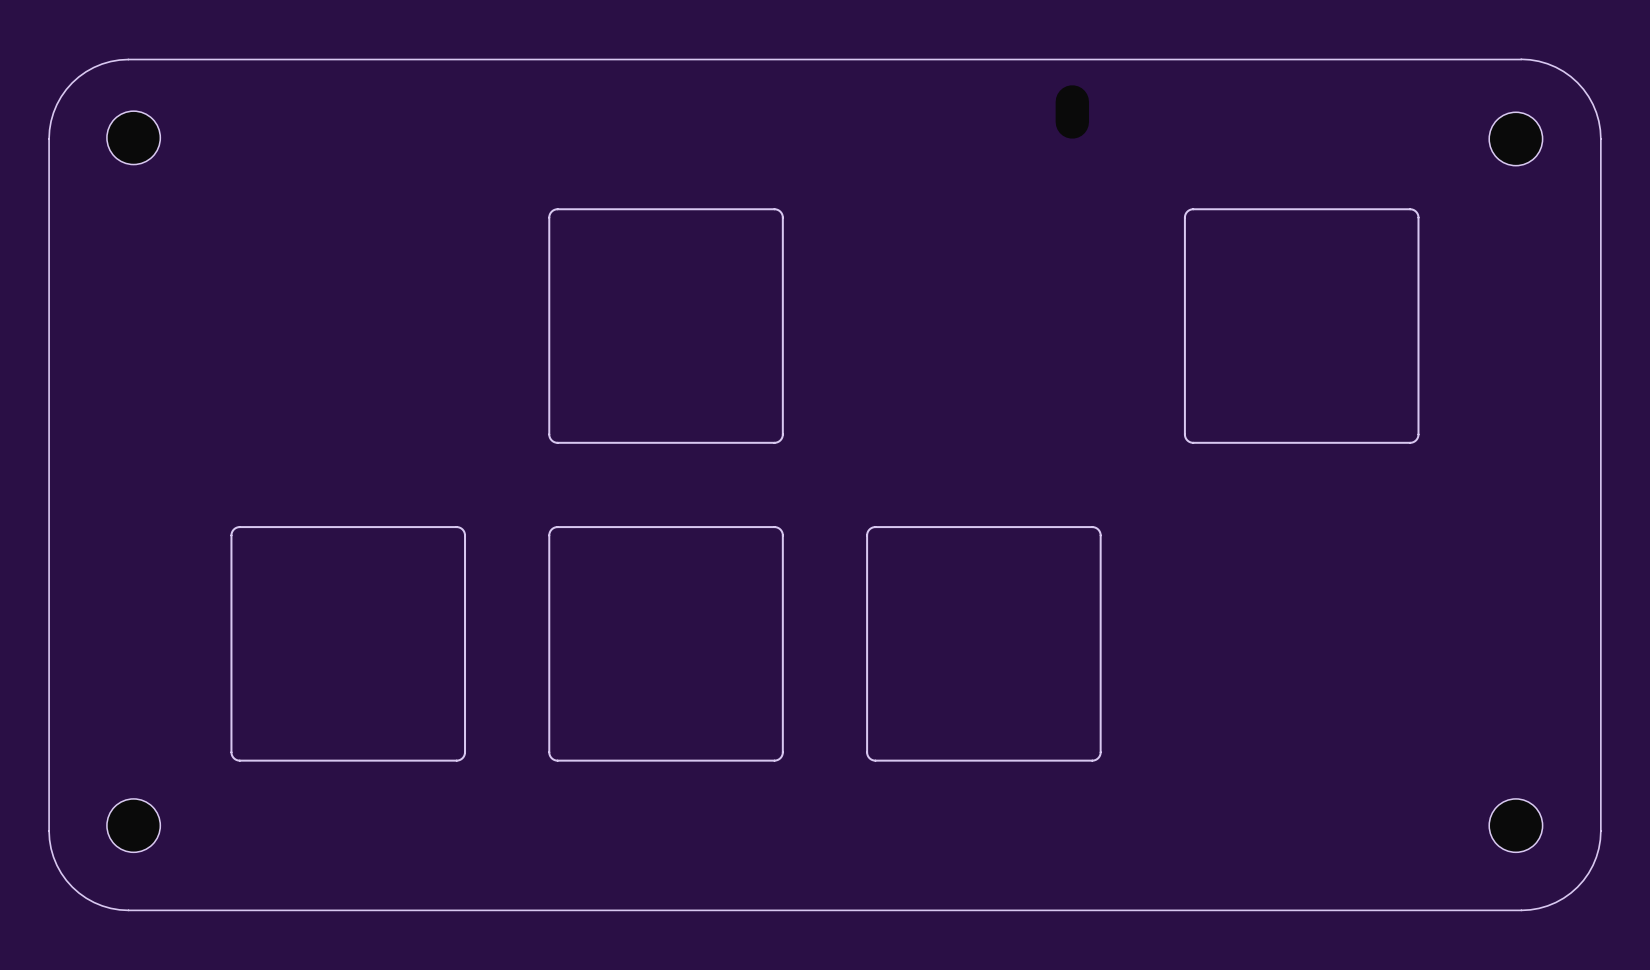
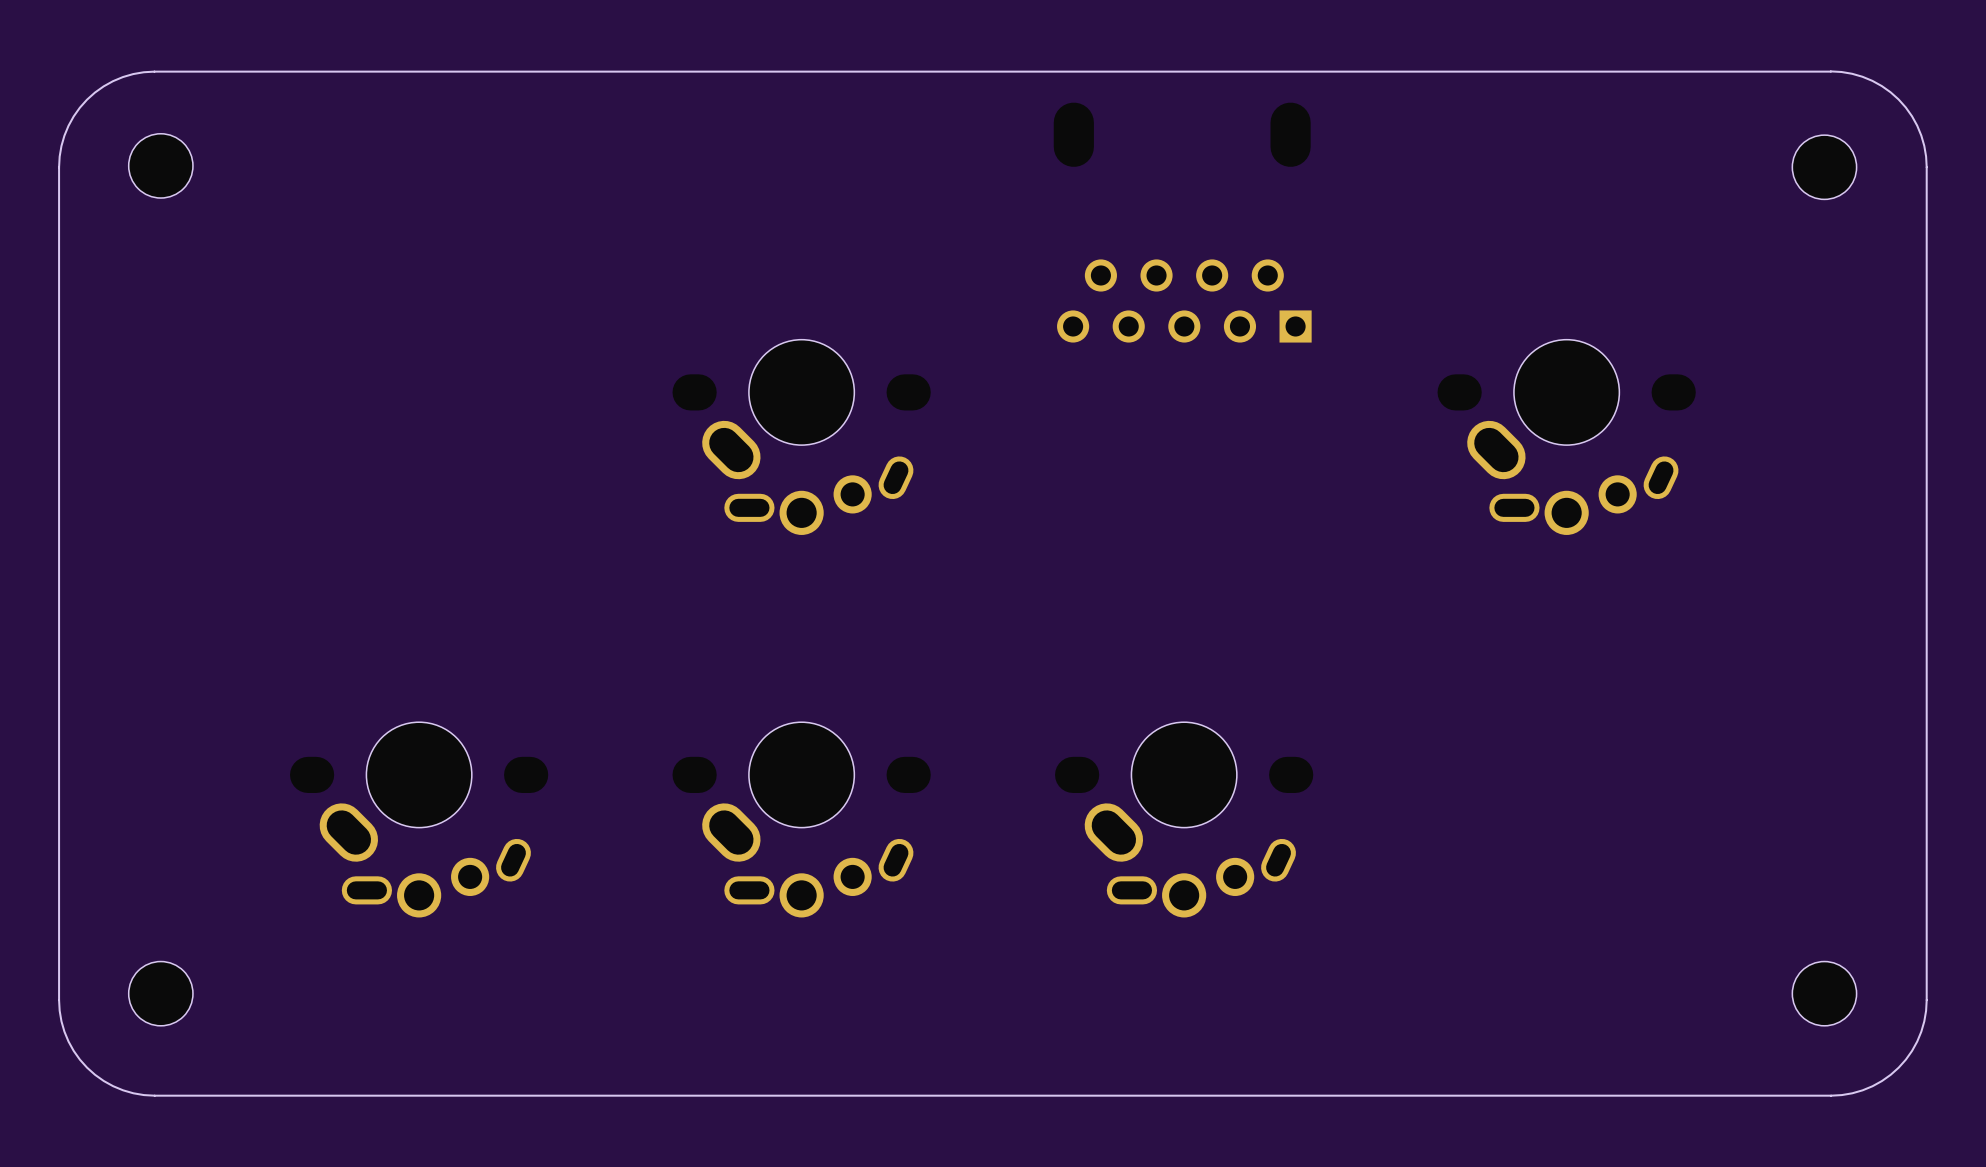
part: none -> (1073, 134)
drawing: [548, 208, 784, 444] -> none
drawing: [1183, 208, 1420, 444] -> none
part: none -> (1184, 300)
part: none -> (801, 437)
part: none -> (1566, 437)
drawing: [230, 526, 467, 762] -> none
drawing: [548, 526, 784, 762] -> none
drawing: [866, 526, 1102, 762] -> none
part: none -> (419, 819)
part: none -> (801, 819)
part: none -> (1184, 819)

